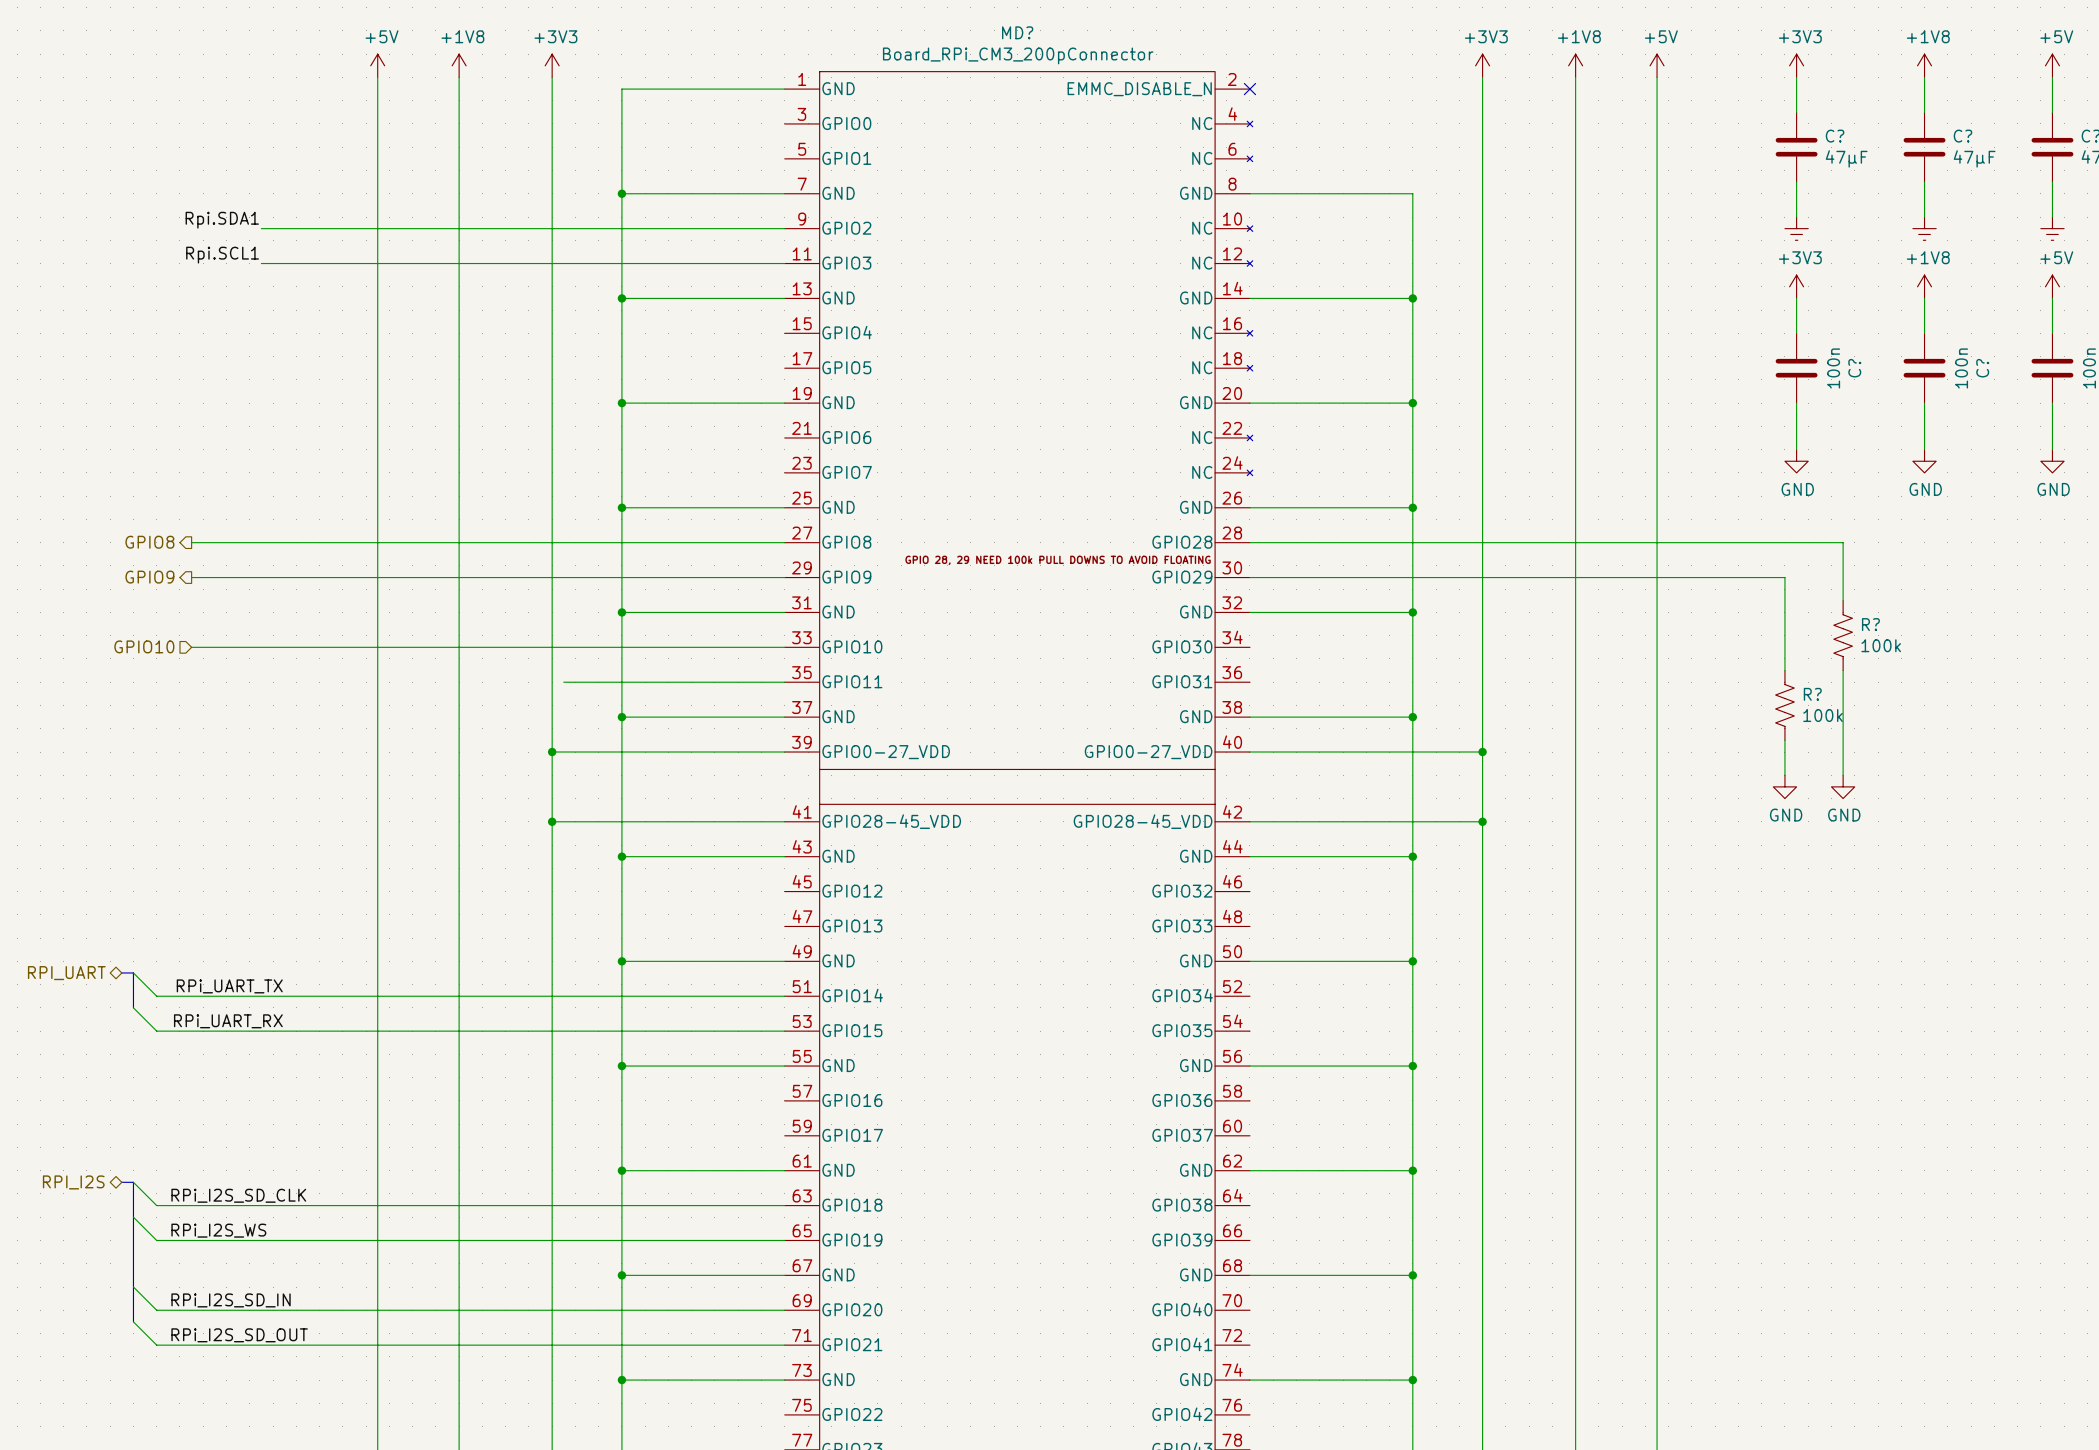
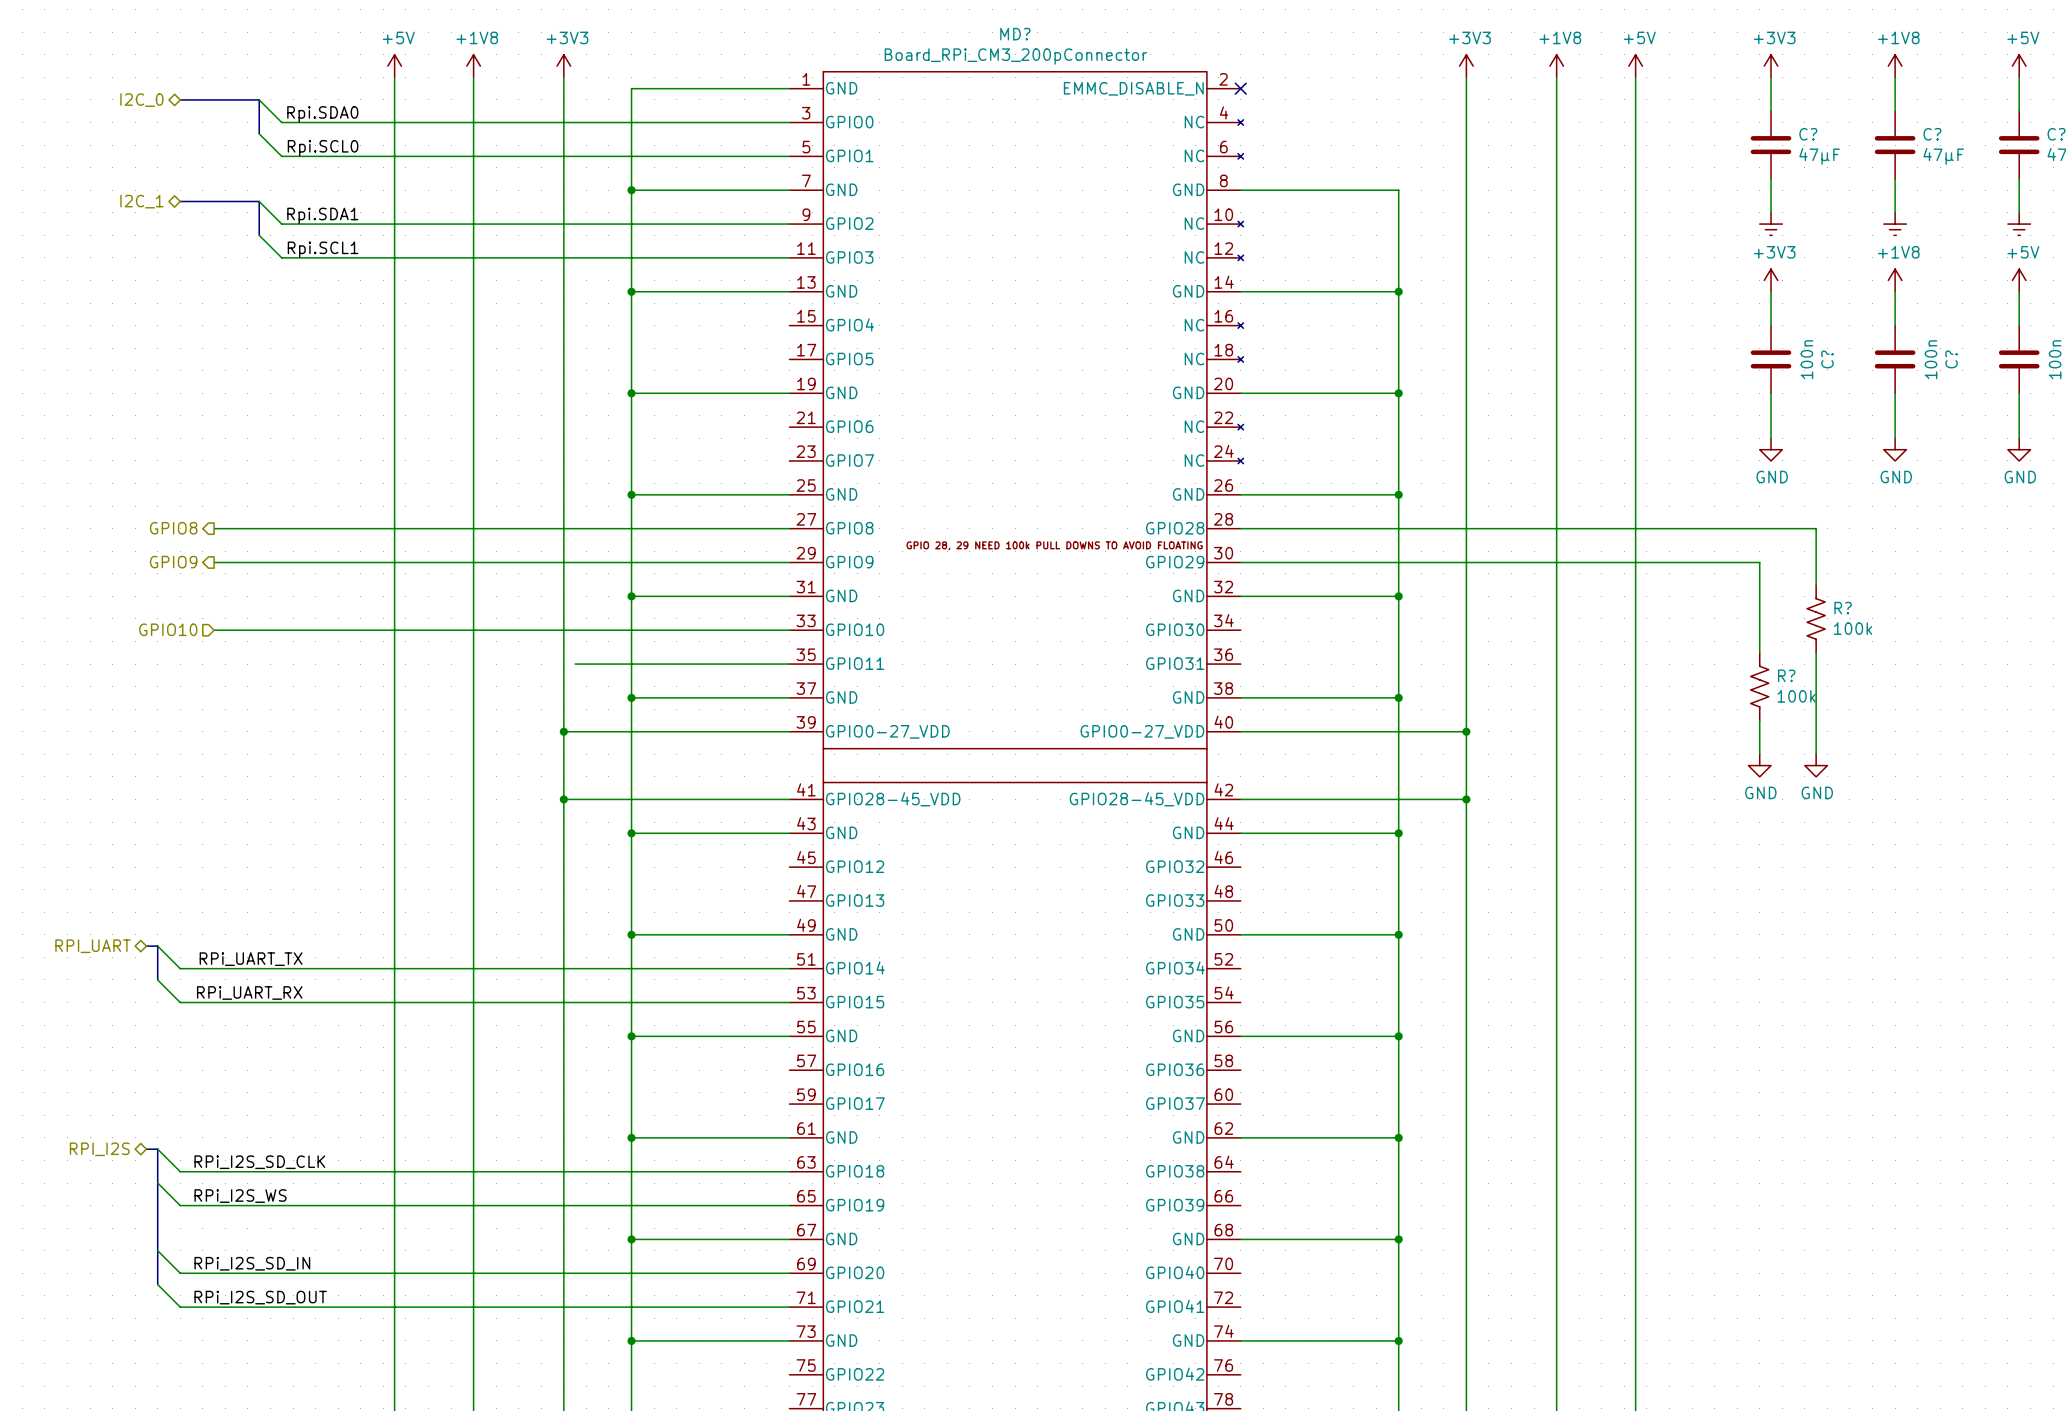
hierarchical label: none -> I2C_0 (141, 100)
bus: none -> (180, 99) (259, 99) (259, 133)
wire: none -> (259, 99) (281, 122) (789, 122)
label: none -> Rpi.SDA0 (322, 114)
wire: none -> (259, 133) (281, 156) (789, 156)
label: none -> Rpi.SCL0 (323, 148)
hierarchical label: none -> I2C_1 (141, 201)
bus: none -> (180, 201) (259, 201) (259, 235)
wire: none -> (259, 201) (281, 224)
label position: Rpi.SDA1 (222, 220) -> Rpi.SDA1 (322, 215)
wire: none -> (259, 235) (281, 257)
label position: Rpi.SCL1 (222, 255) -> Rpi.SCL1 (323, 249)

